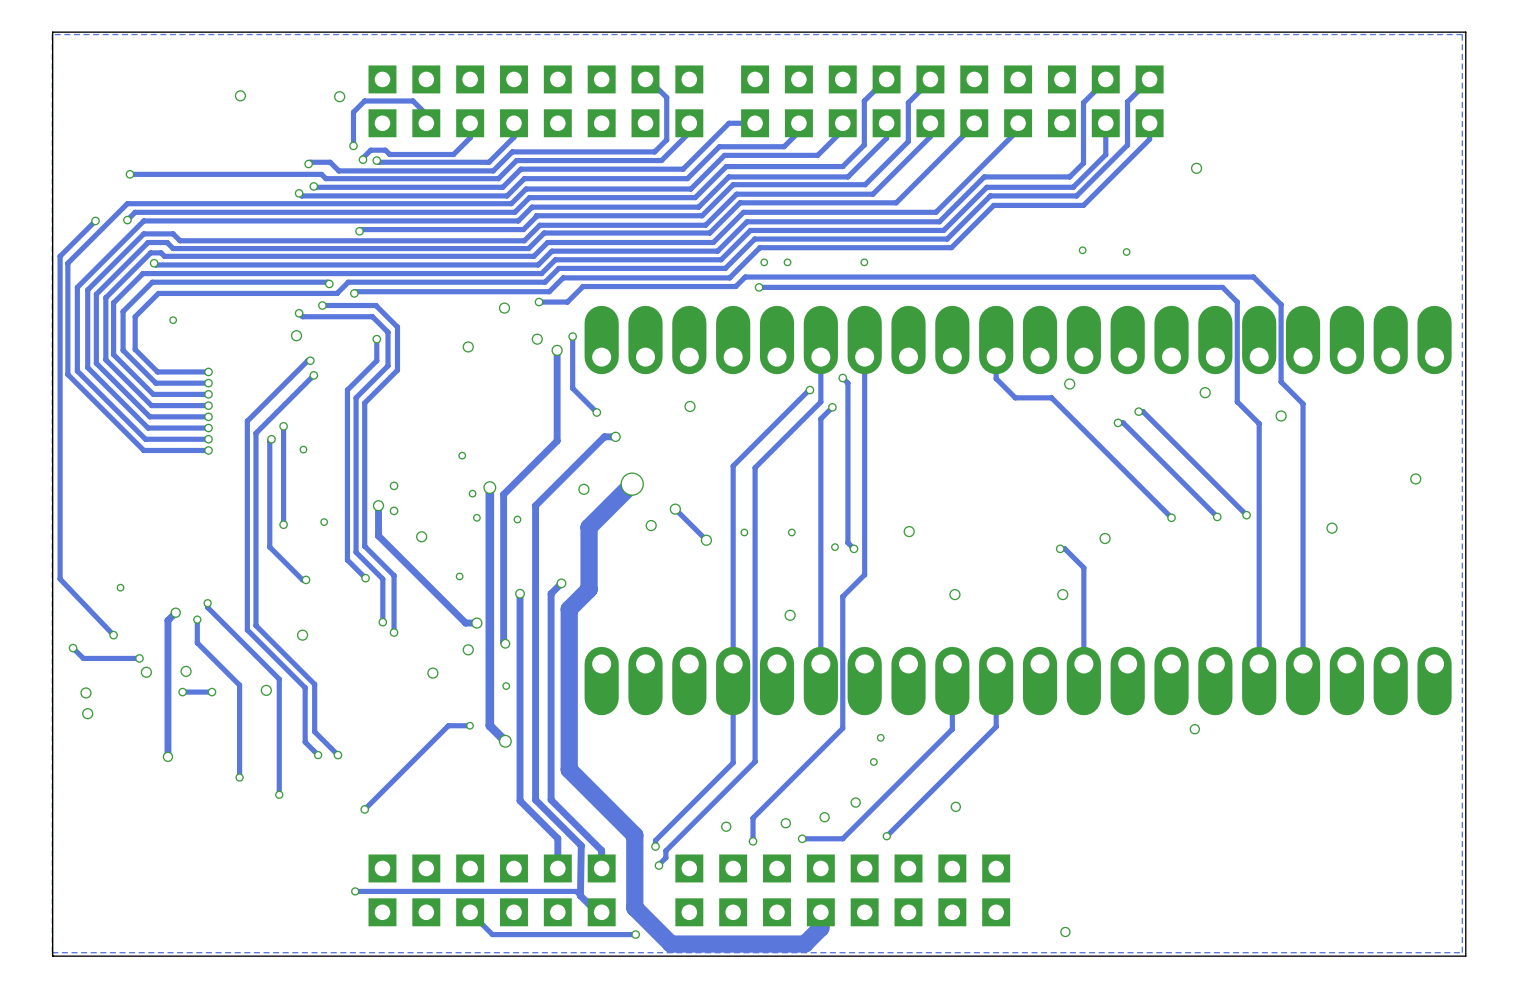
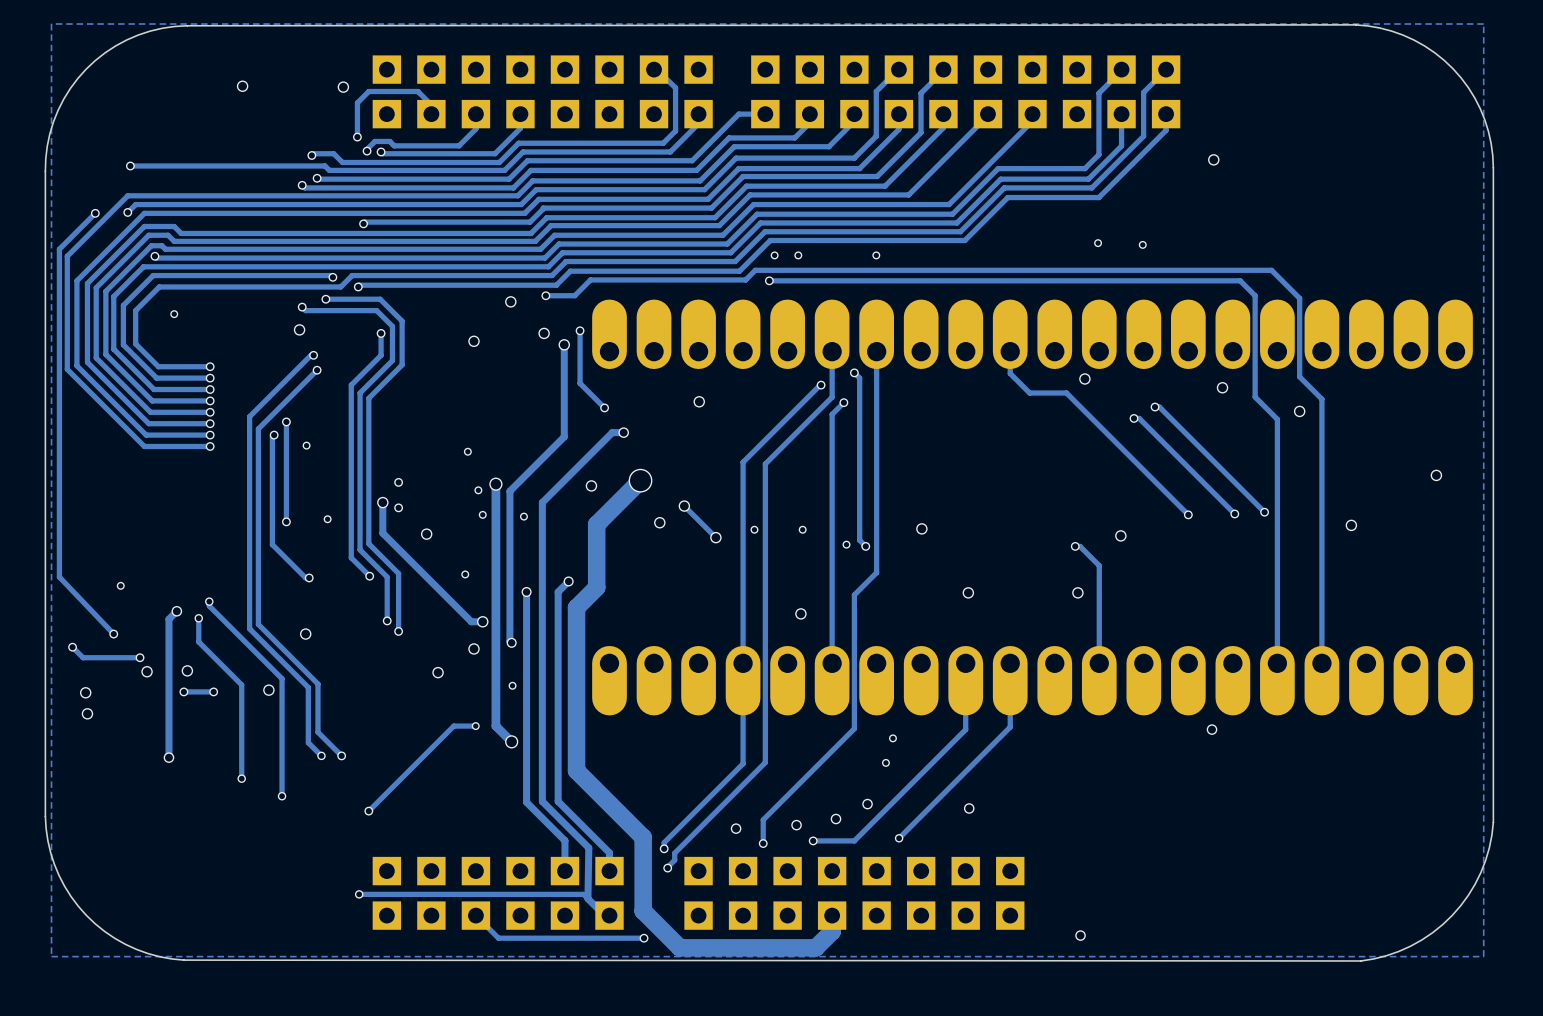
board edge: (1465, 32) (52, 32) (52, 956) (1465, 956) (1465, 32) -> (1355, 24) (1379, 28) (1403, 35) (1424, 46) (1444, 60) (1461, 77) (1480, 108) (1488, 131) (1492, 155) (1493, 822) (1485, 860) (1475, 884) (1452, 915) (1432, 932) (1398, 951) (1361, 960) (183, 960) (147, 953) (114, 938) (95, 923) (71, 896) (54, 864) (47, 840) (45, 816) (45, 158) (49, 134) (63, 99) (77, 78) (105, 52) (126, 39) (150, 31) (187, 25) (1355, 24)

